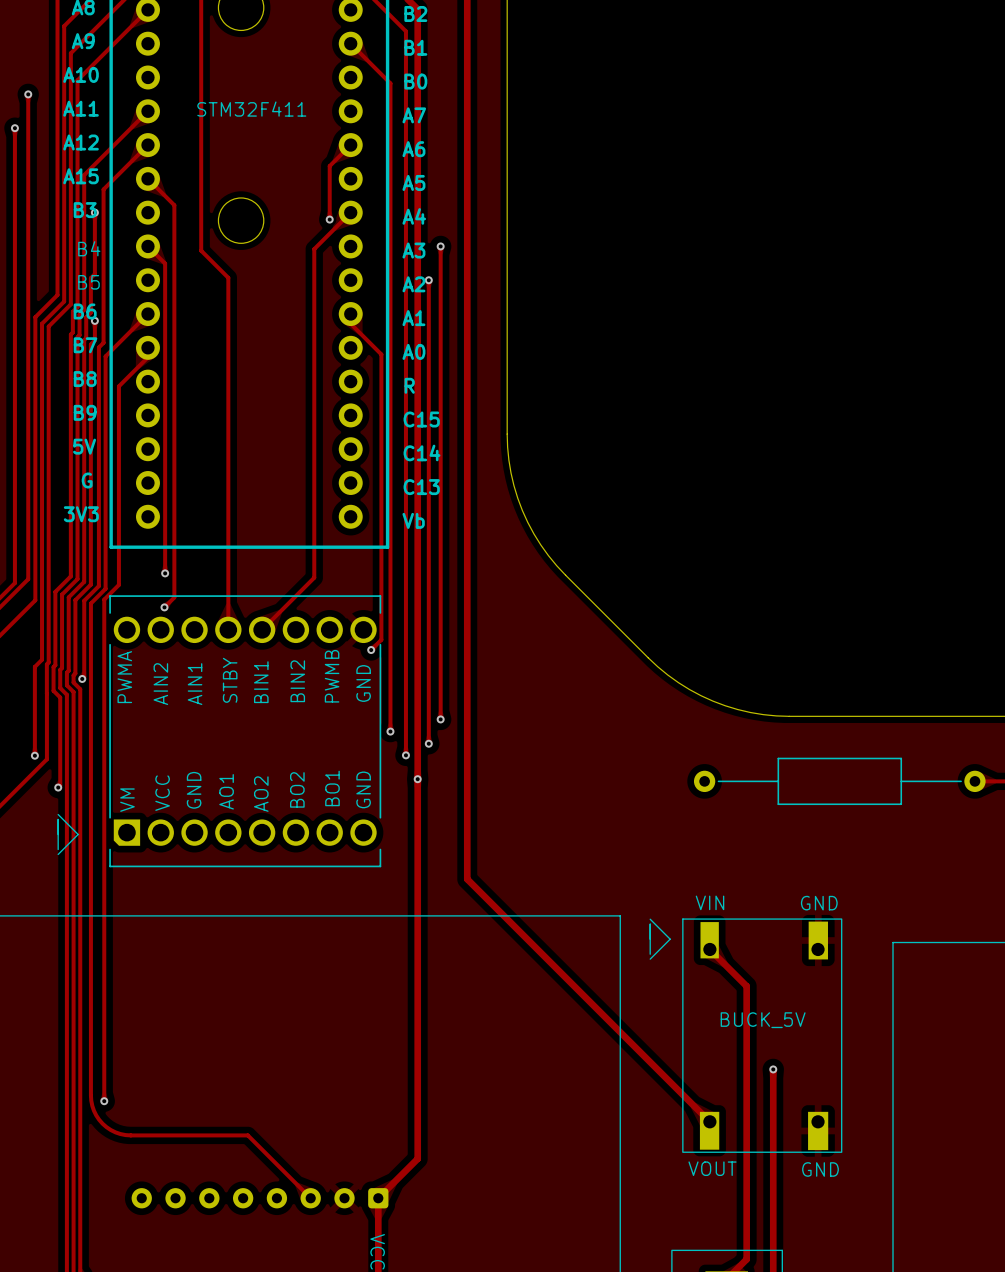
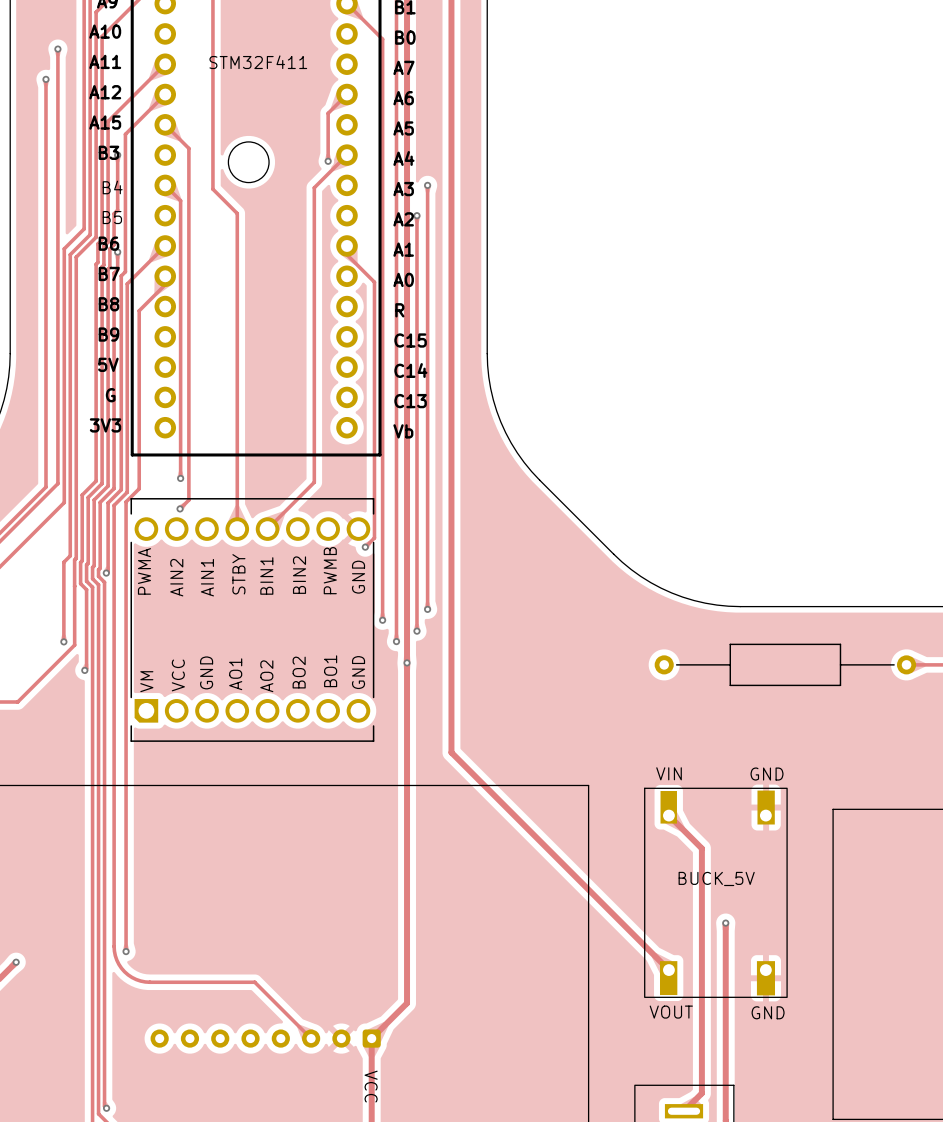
line: (58, 814) (78, 834) (58, 854) -> none
line: (58, 819) (58, 849) -> none
line: (650, 919) (670, 939) (650, 959) -> none
line: (650, 924) (650, 954) -> none

